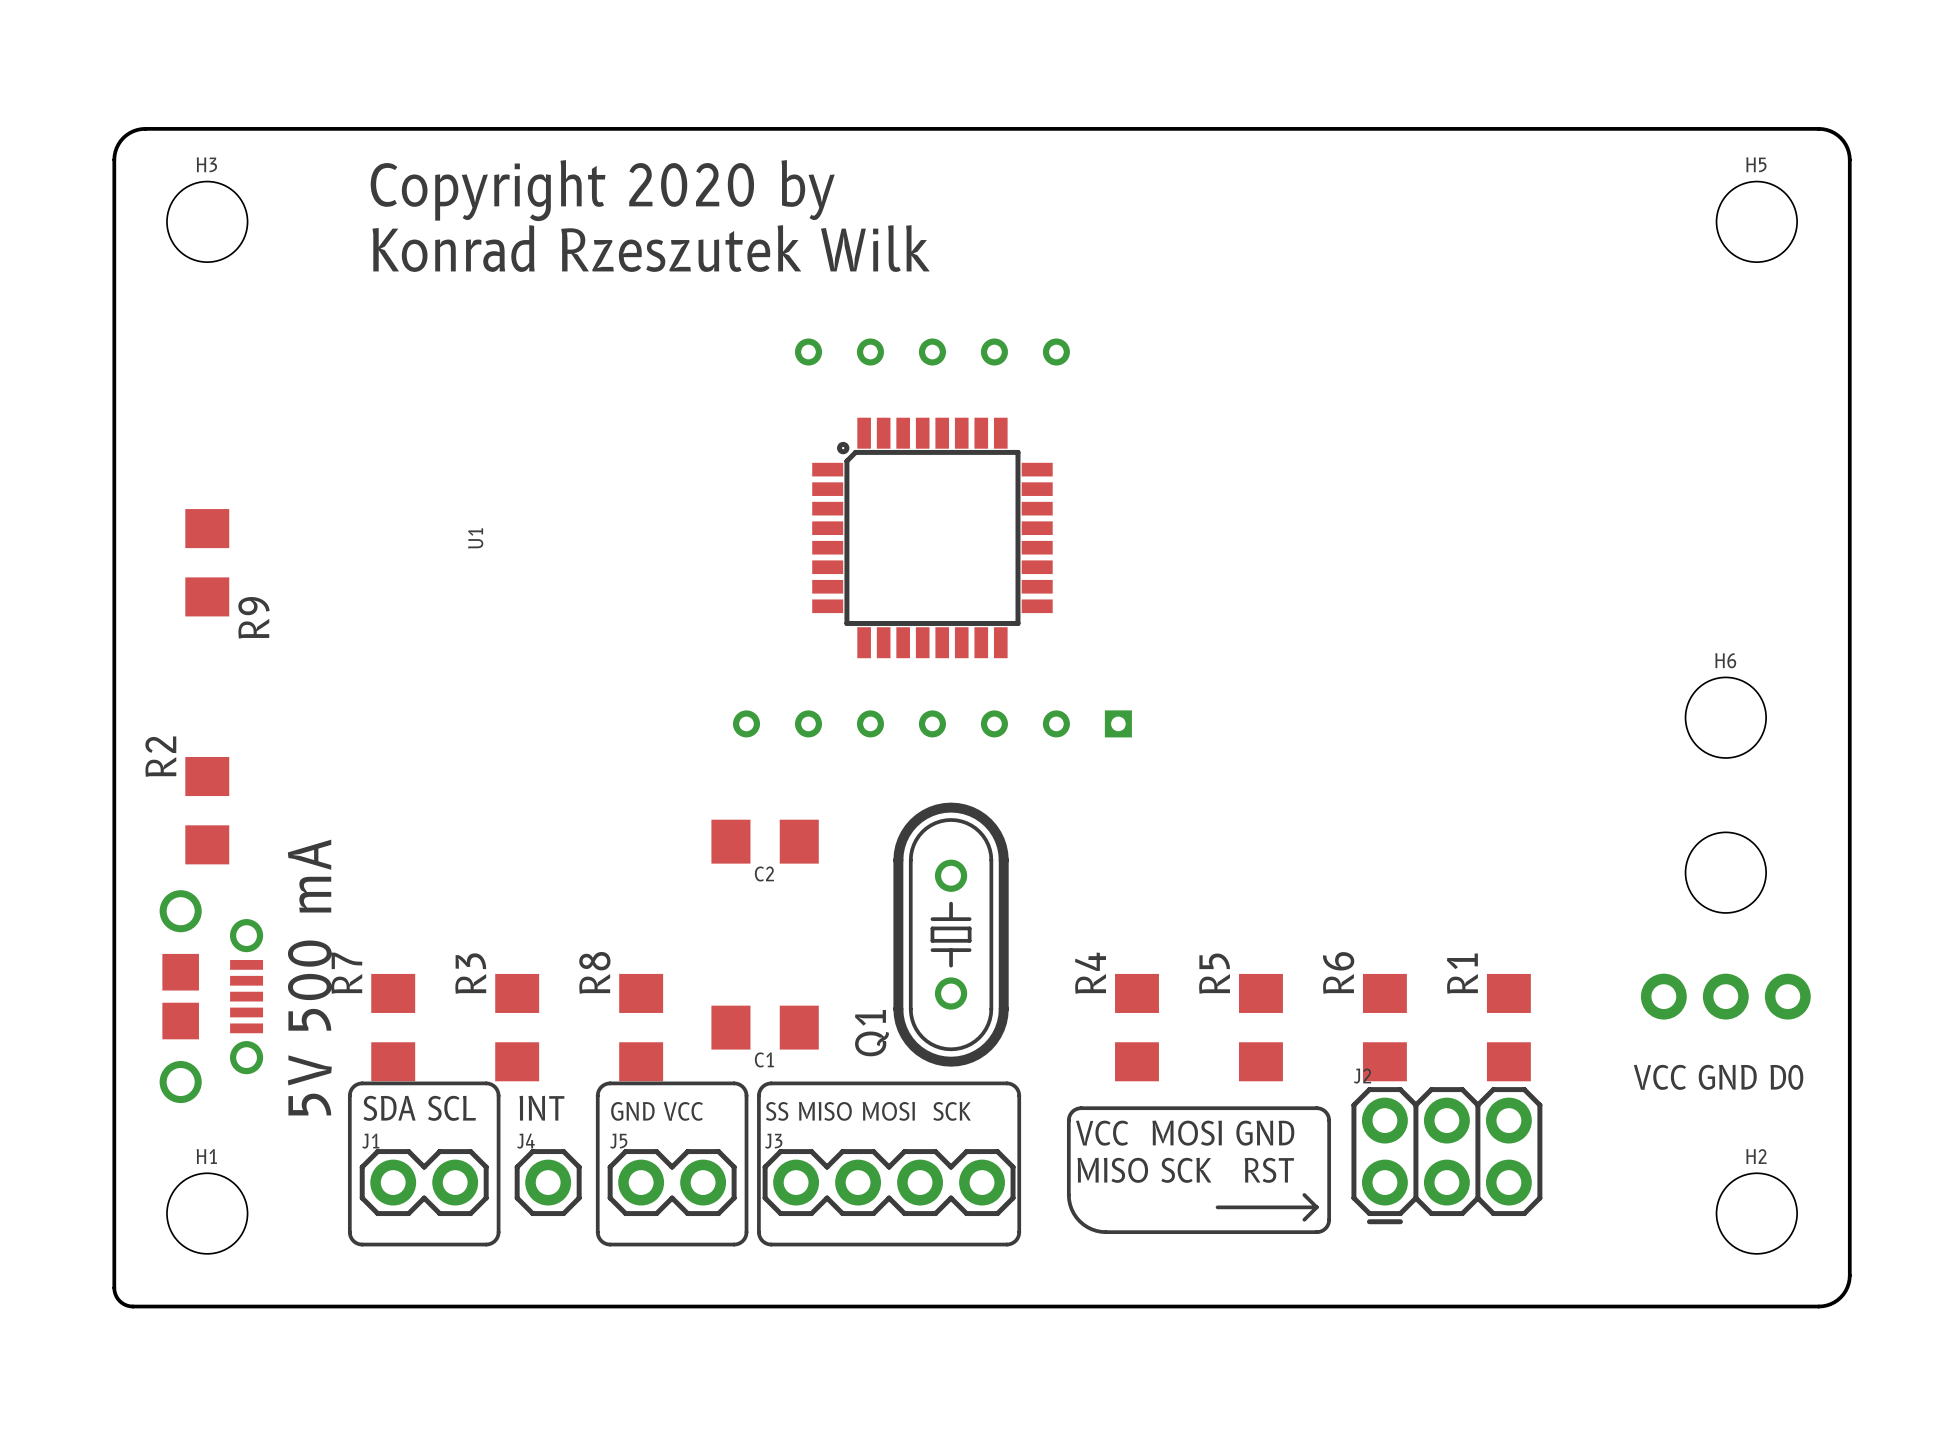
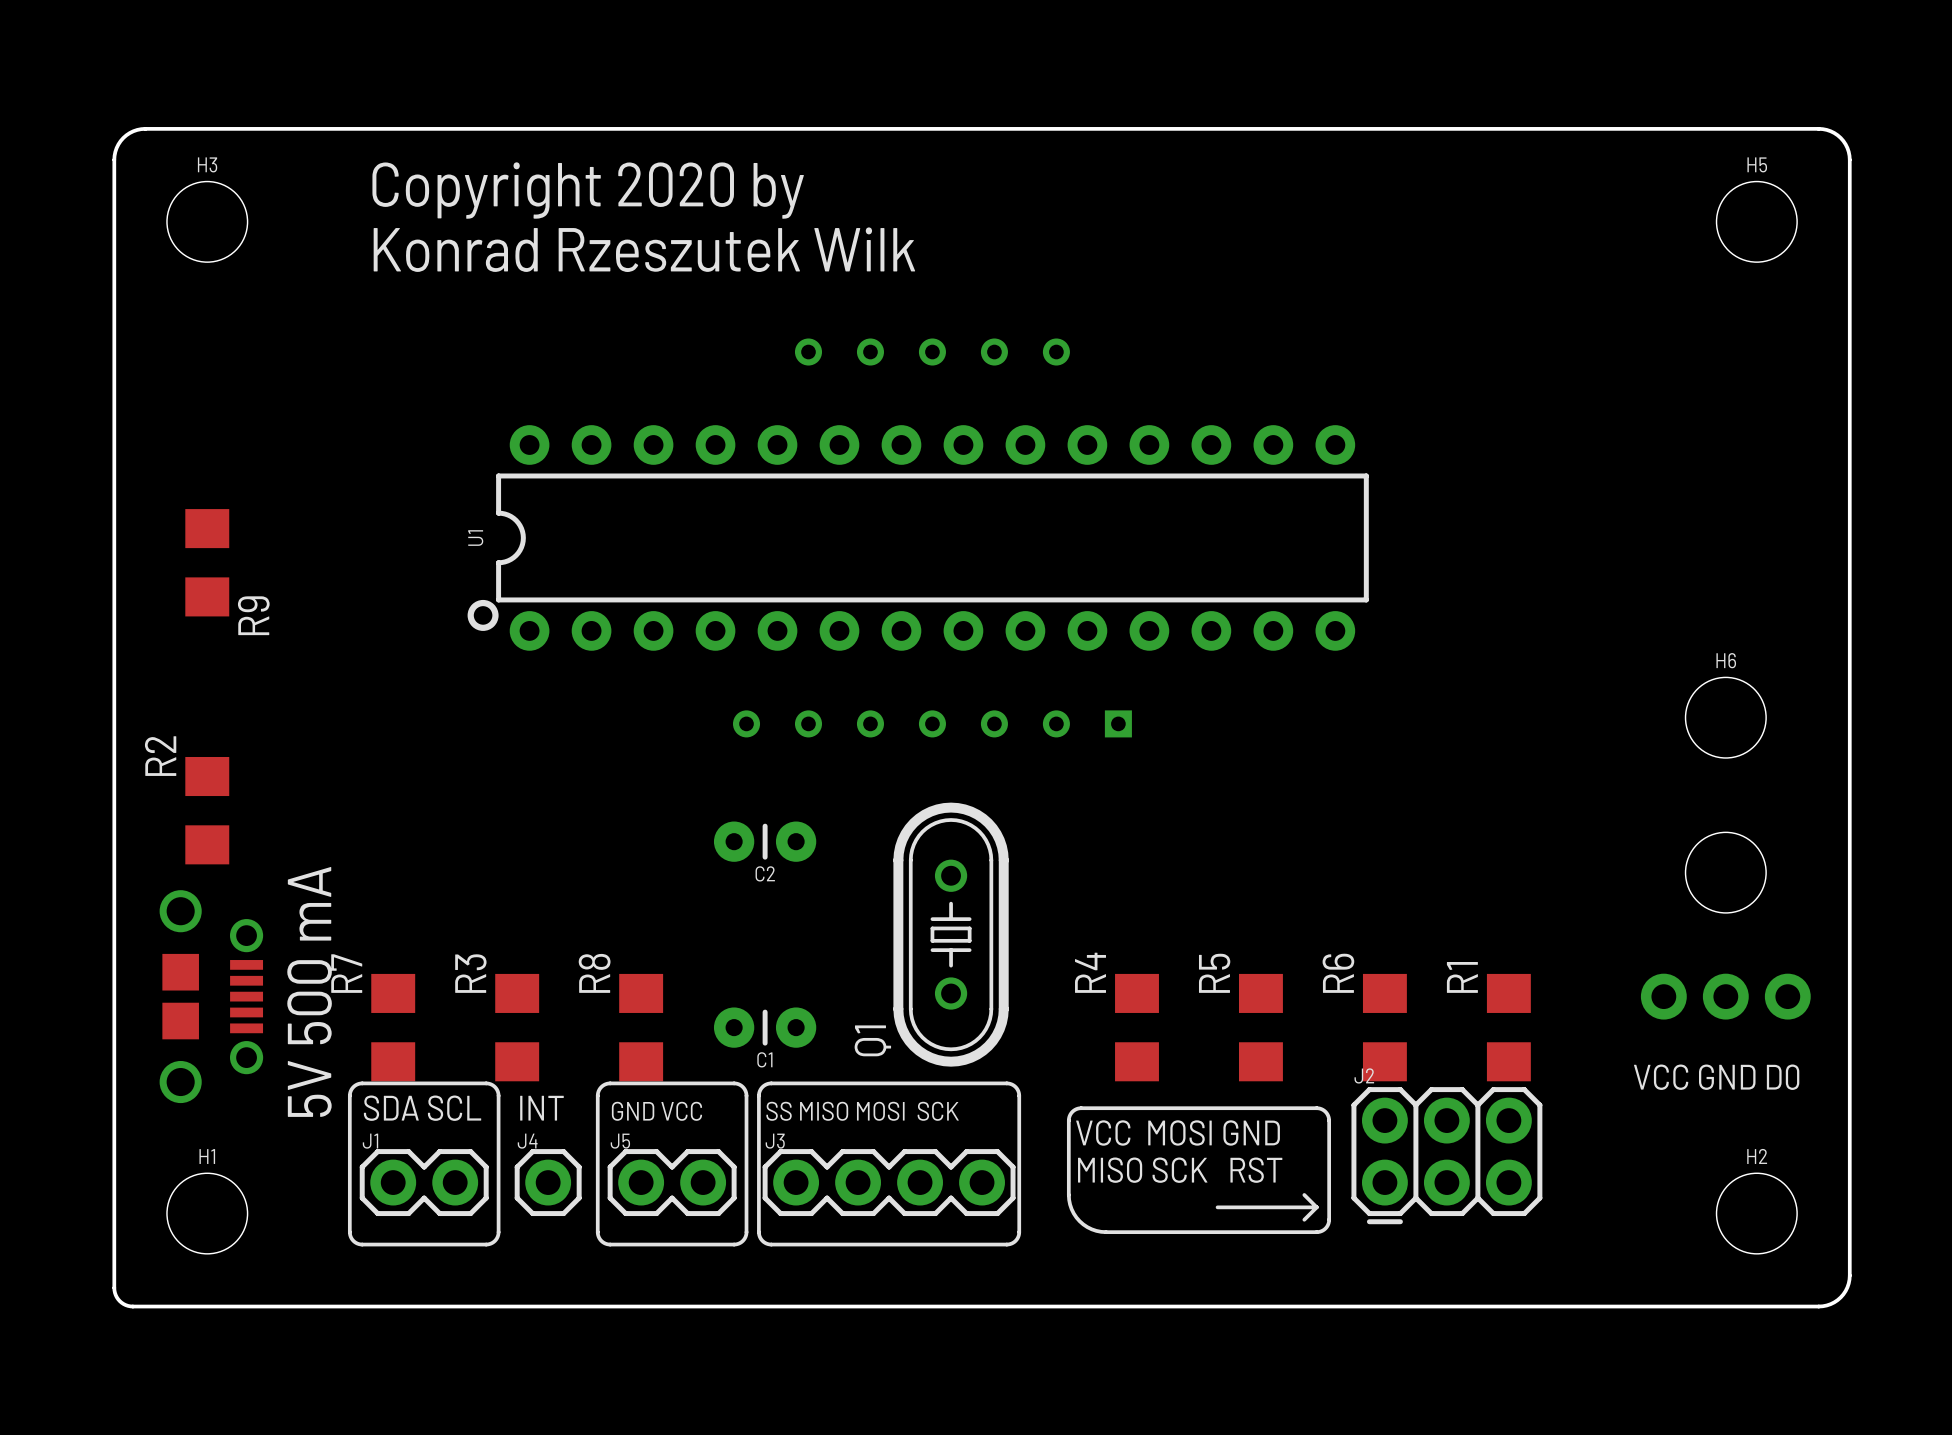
U1 footprint: [812, 417, 1053, 659] -> [467, 425, 1369, 651]
C2 footprint: [711, 819, 819, 864] -> [713, 821, 817, 862]
C1 footprint: [711, 1005, 819, 1050] -> [713, 1007, 817, 1048]

